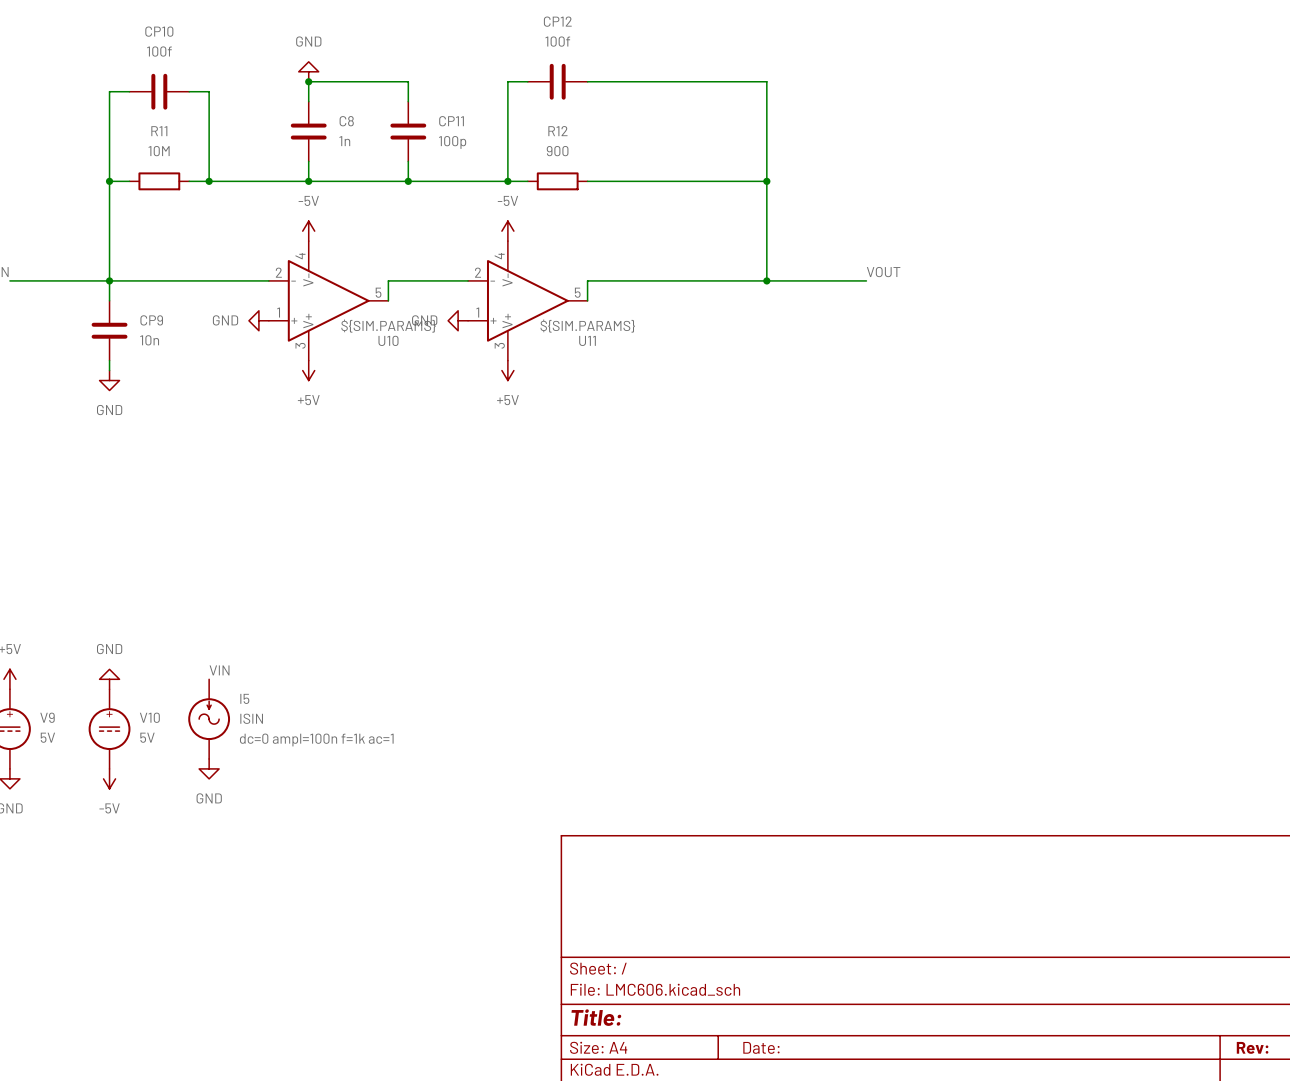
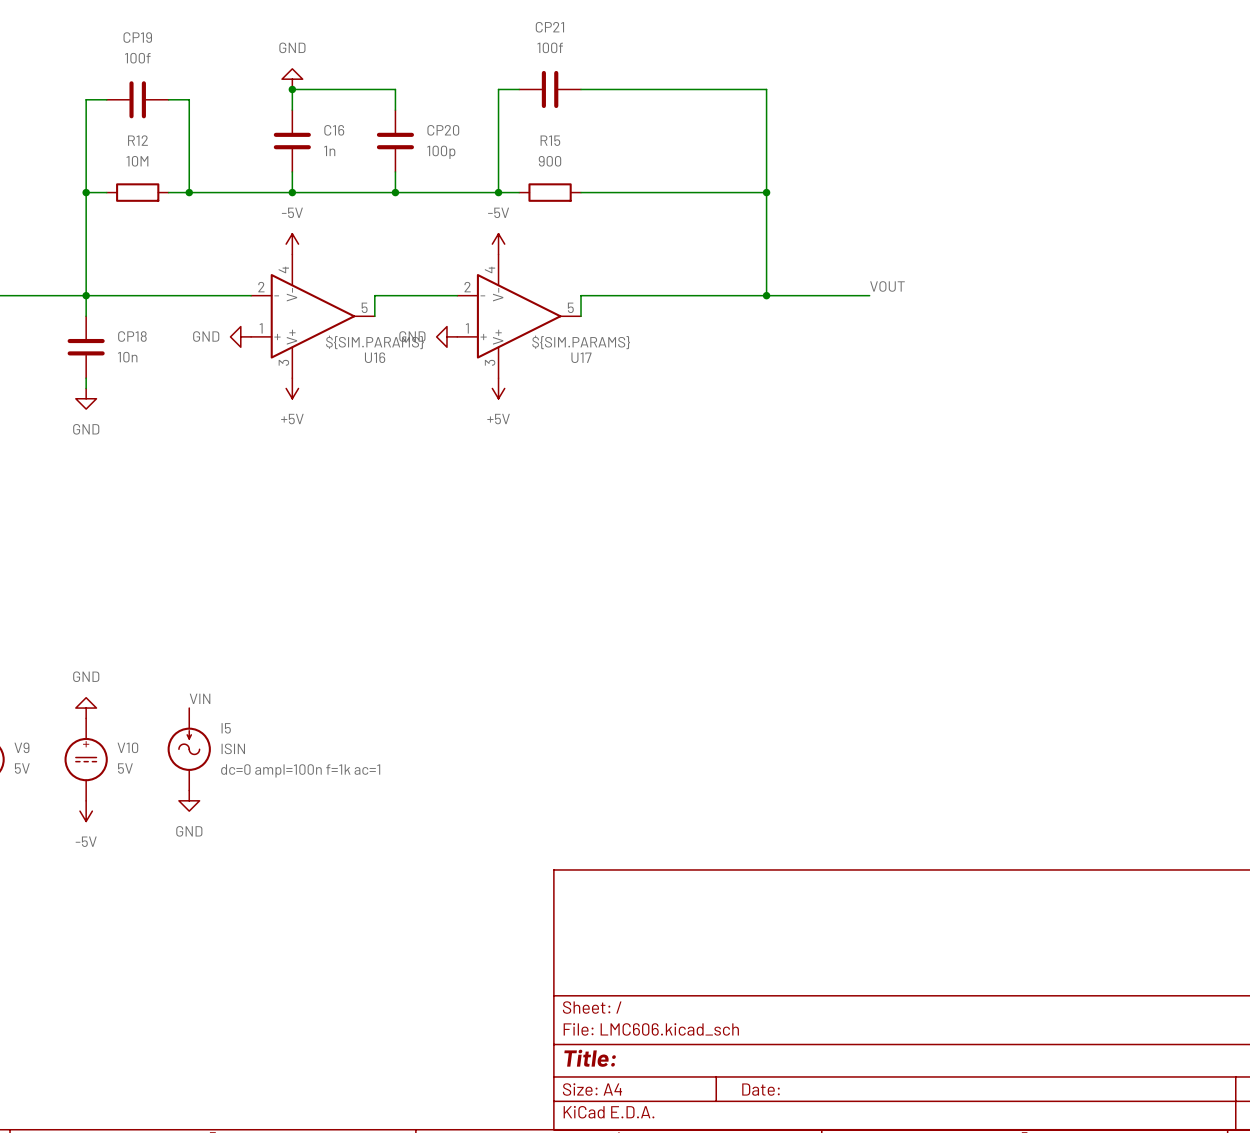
CP12 name: CP12 (557, 21) -> CP21 (549, 27)
CP10 name: CP10 (159, 31) -> CP19 (137, 37)
C8 name: C8 (346, 121) -> C16 (334, 130)
CP11 name: CP11 (451, 121) -> CP20 (443, 130)
R11 name: R11 (159, 131) -> R12 (137, 140)
R12 name: R12 (557, 131) -> R15 (550, 140)
CP9 name: CP9 (151, 320) -> CP18 (132, 336)
U10 name: U10 (388, 340) -> U16 (375, 357)
U11 name: U11 (587, 340) -> U17 (581, 357)

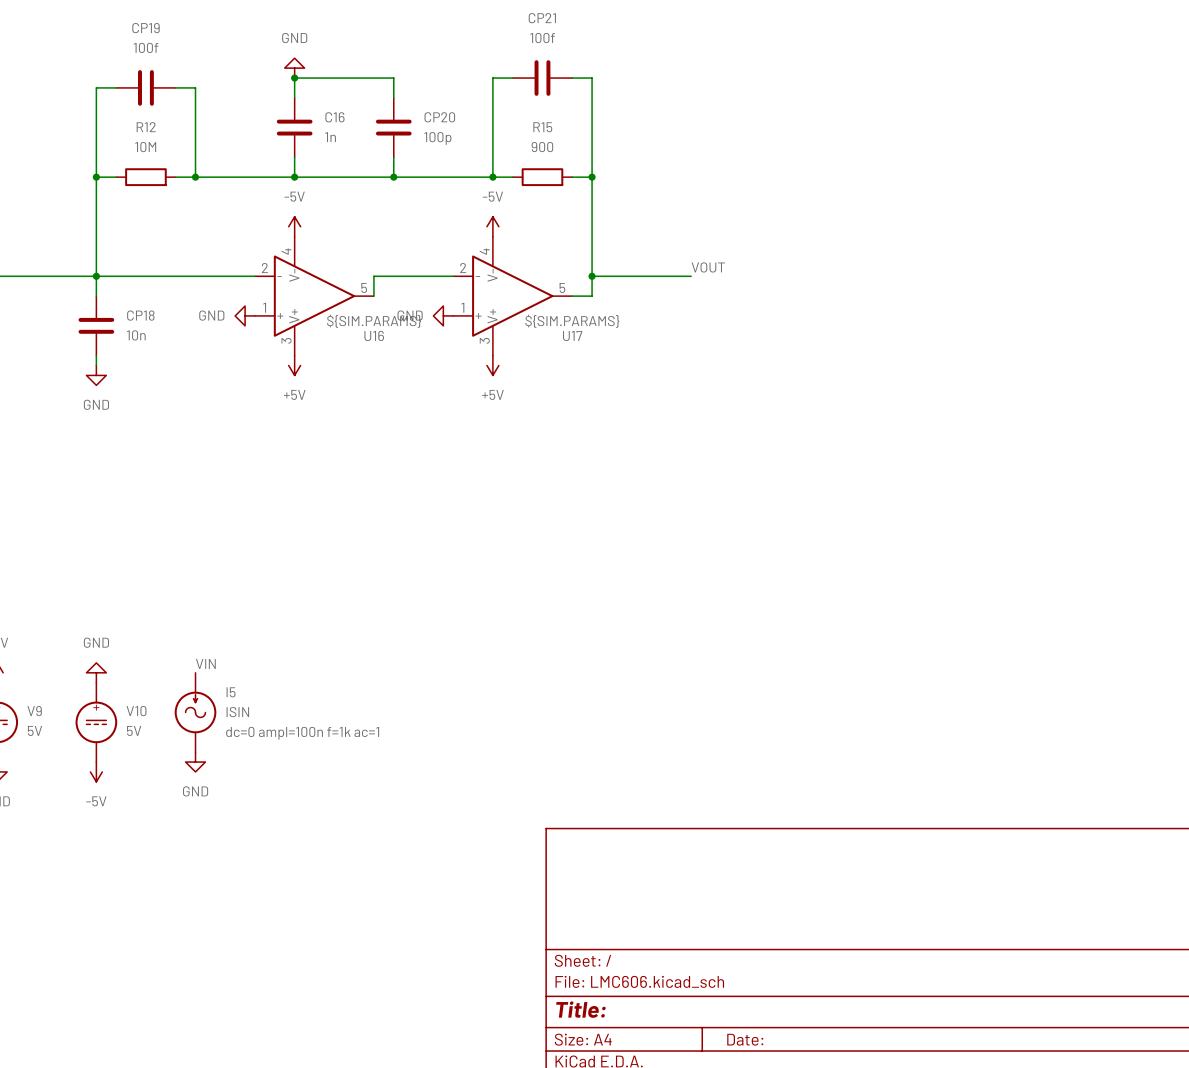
wire: (601, 89) (766, 89) (766, 295) -> (592, 78) (592, 296) (572, 296)
wire: (601, 192) (766, 192) -> none
junction: none -> (592, 177)
junction: (766, 192) -> none
label position: VOUT (887, 286) -> VOUT (708, 267)
wire: (601, 295) (581, 295) (581, 316) -> none
junction: none -> (592, 276)
wire: (704, 295) (869, 295) -> none
junction: (766, 295) -> none

